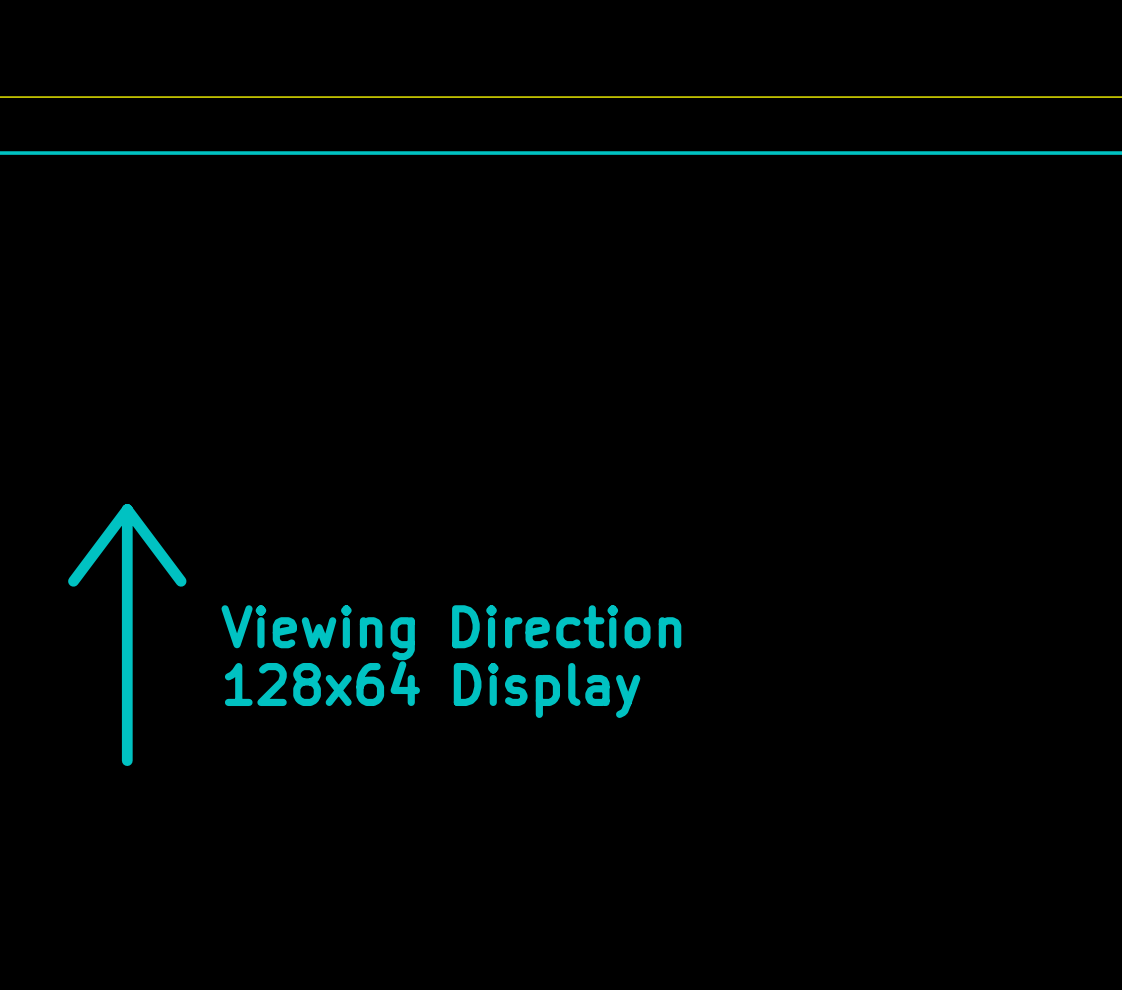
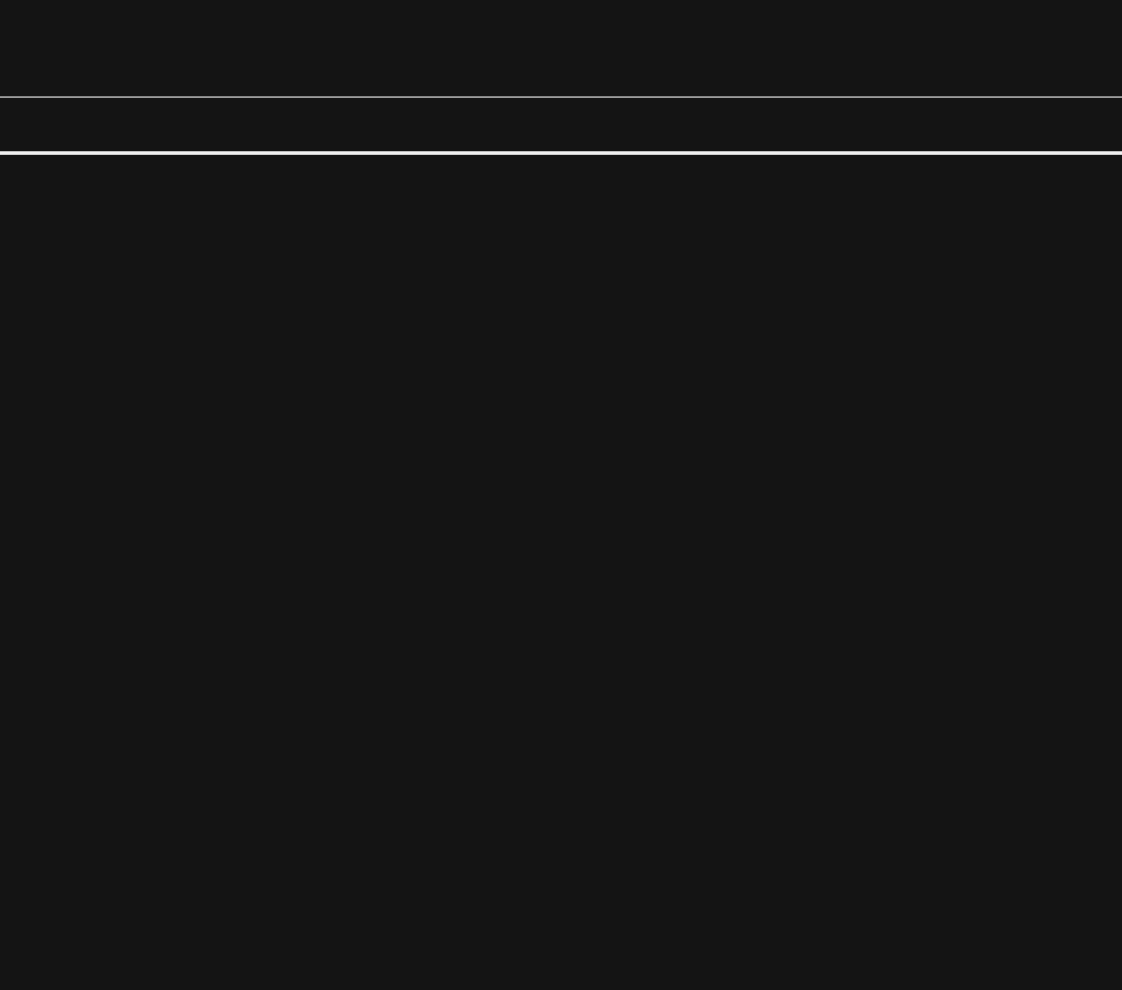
line: (127, 509) (181, 581) -> none
line: (127, 509) (73, 581) -> none
line: (127, 509) (127, 760) -> none
text: Viewing Direction (451, 632) -> none
text: 128x64 Display (432, 689) -> none

